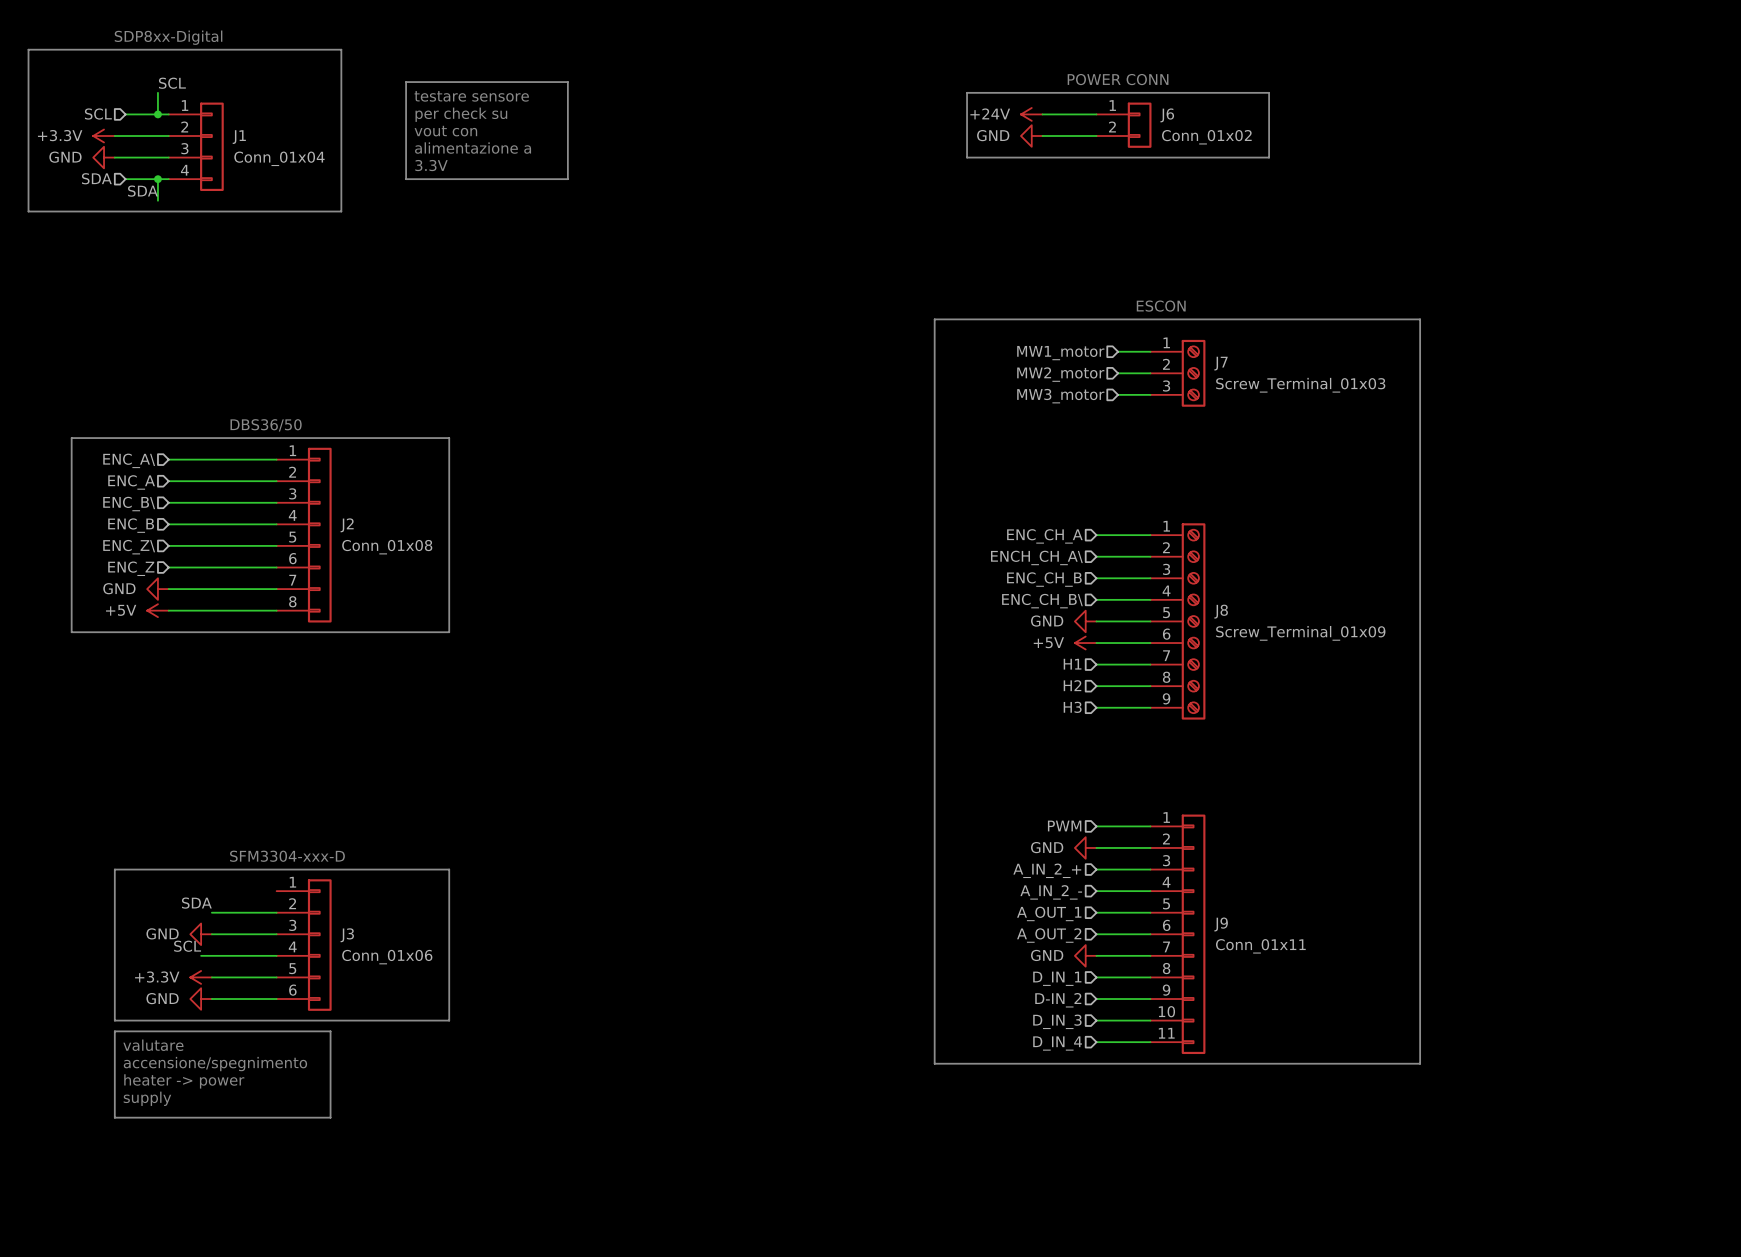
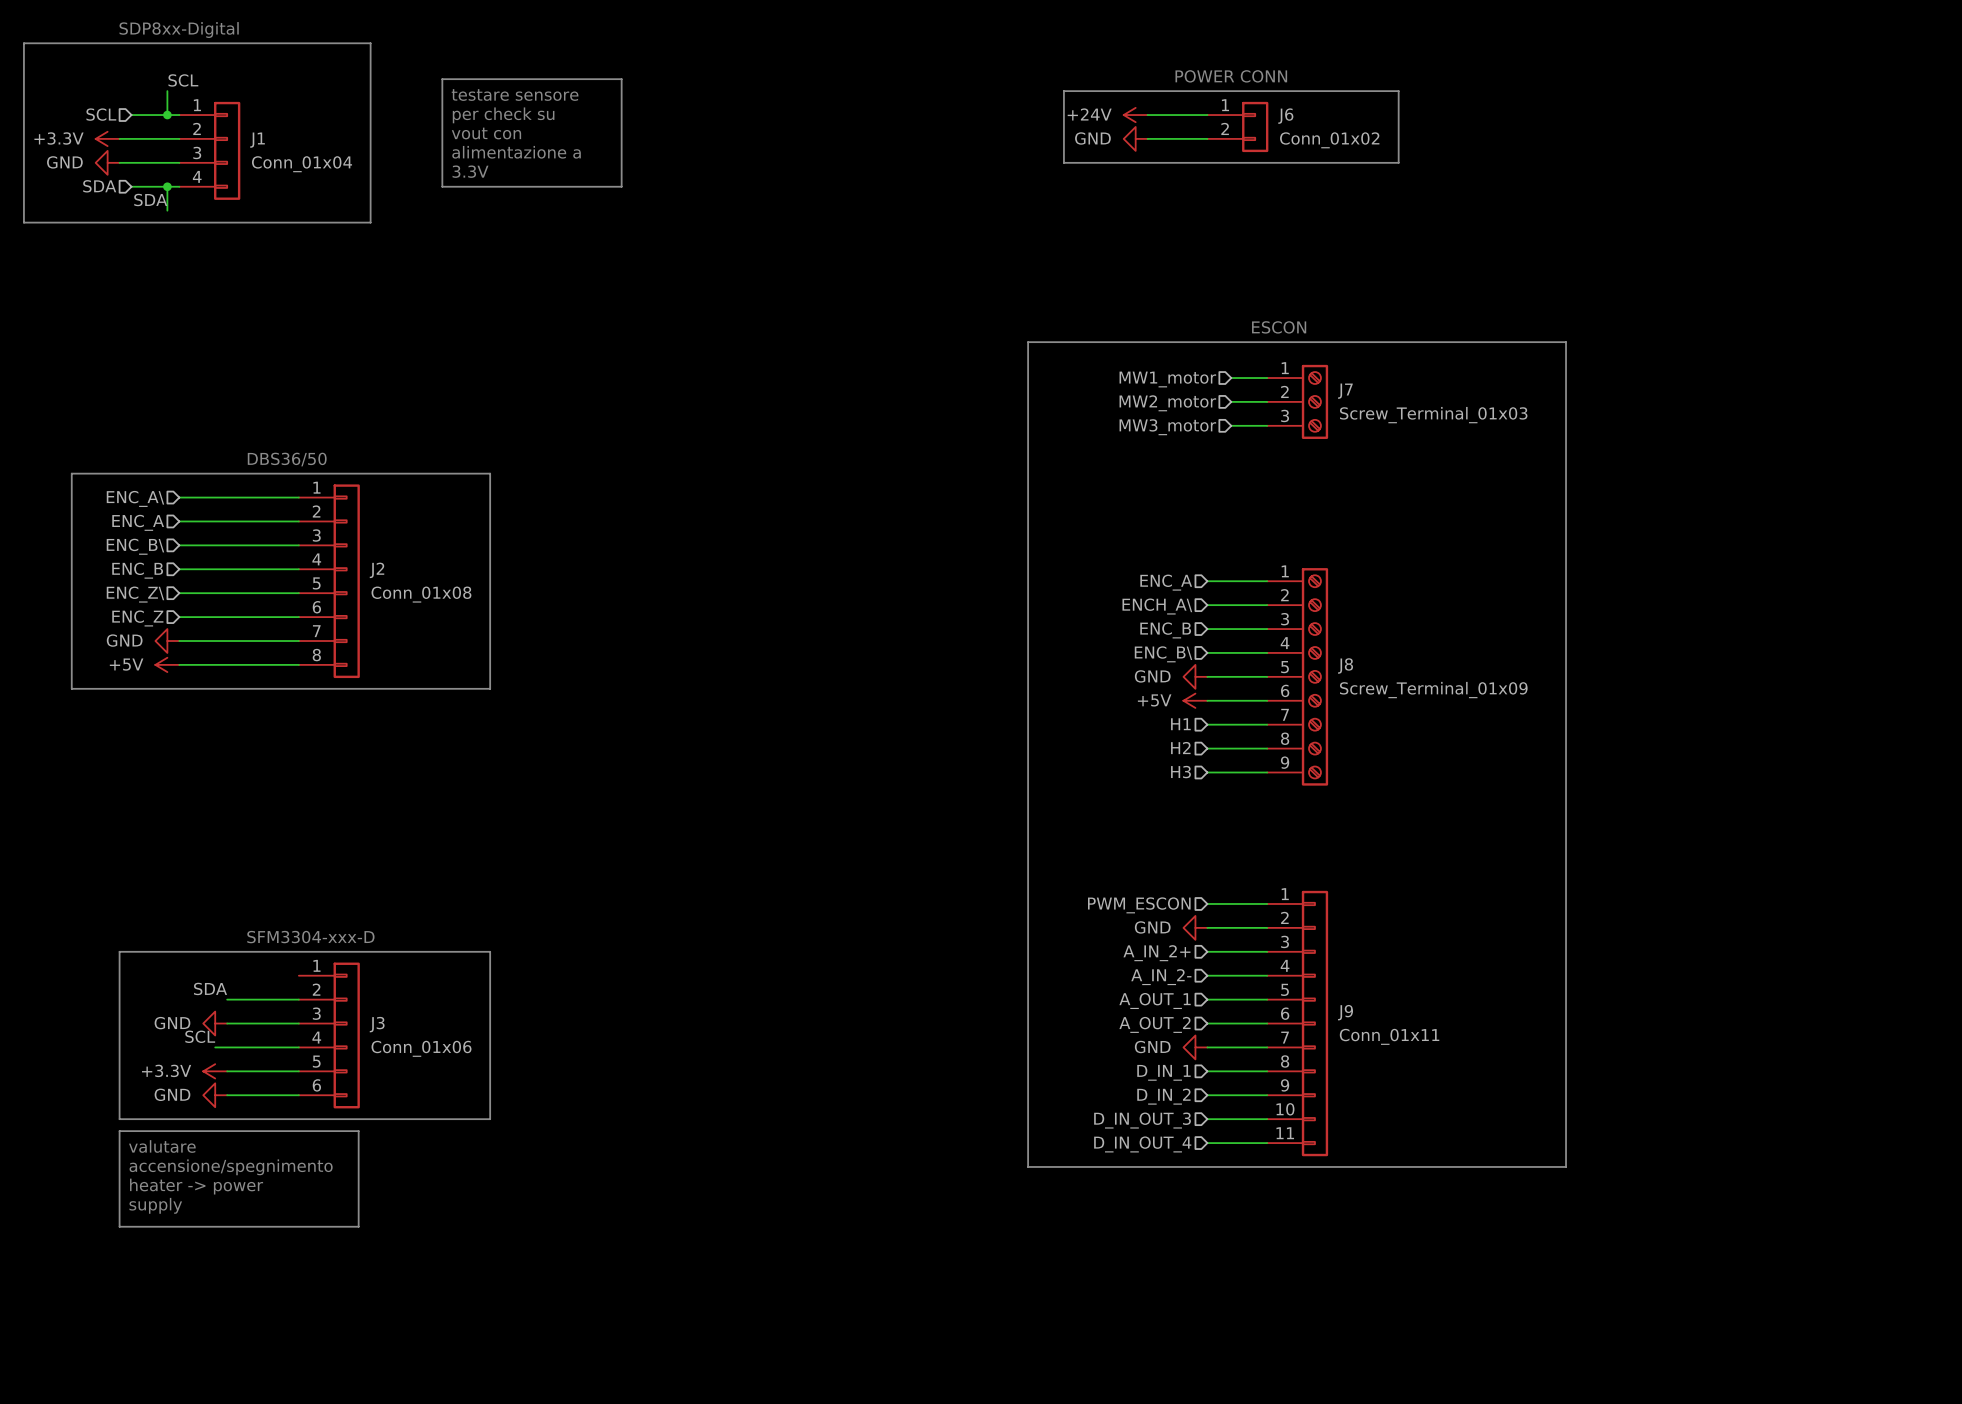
hierarchical label: ENC_CH_A (1044, 536) -> ENC_A (1166, 582)
hierarchical label: ENCH_CH_A\ (1036, 557) -> ENCH_A\ (1157, 606)
hierarchical label: ENC_CH_B (1044, 579) -> ENC_B (1165, 630)
hierarchical label: ENC_CH_B\ (1042, 601) -> ENC_B\ (1163, 654)
hierarchical label: PWM (1064, 826) -> PWM_ESCON (1139, 905)
hierarchical label: A_IN_2_+ (1047, 870) -> A_IN_2+ (1156, 953)
hierarchical label: A_IN_2_- (1051, 892) -> A_IN_2- (1161, 977)
hierarchical label: D-IN_2 (1058, 1000) -> D_IN_2 (1163, 1096)
hierarchical label: D_IN_3 (1057, 1021) -> D_IN_OUT_3 (1142, 1120)
hierarchical label: D_IN_4 (1057, 1043) -> D_IN_OUT_4 (1142, 1144)

